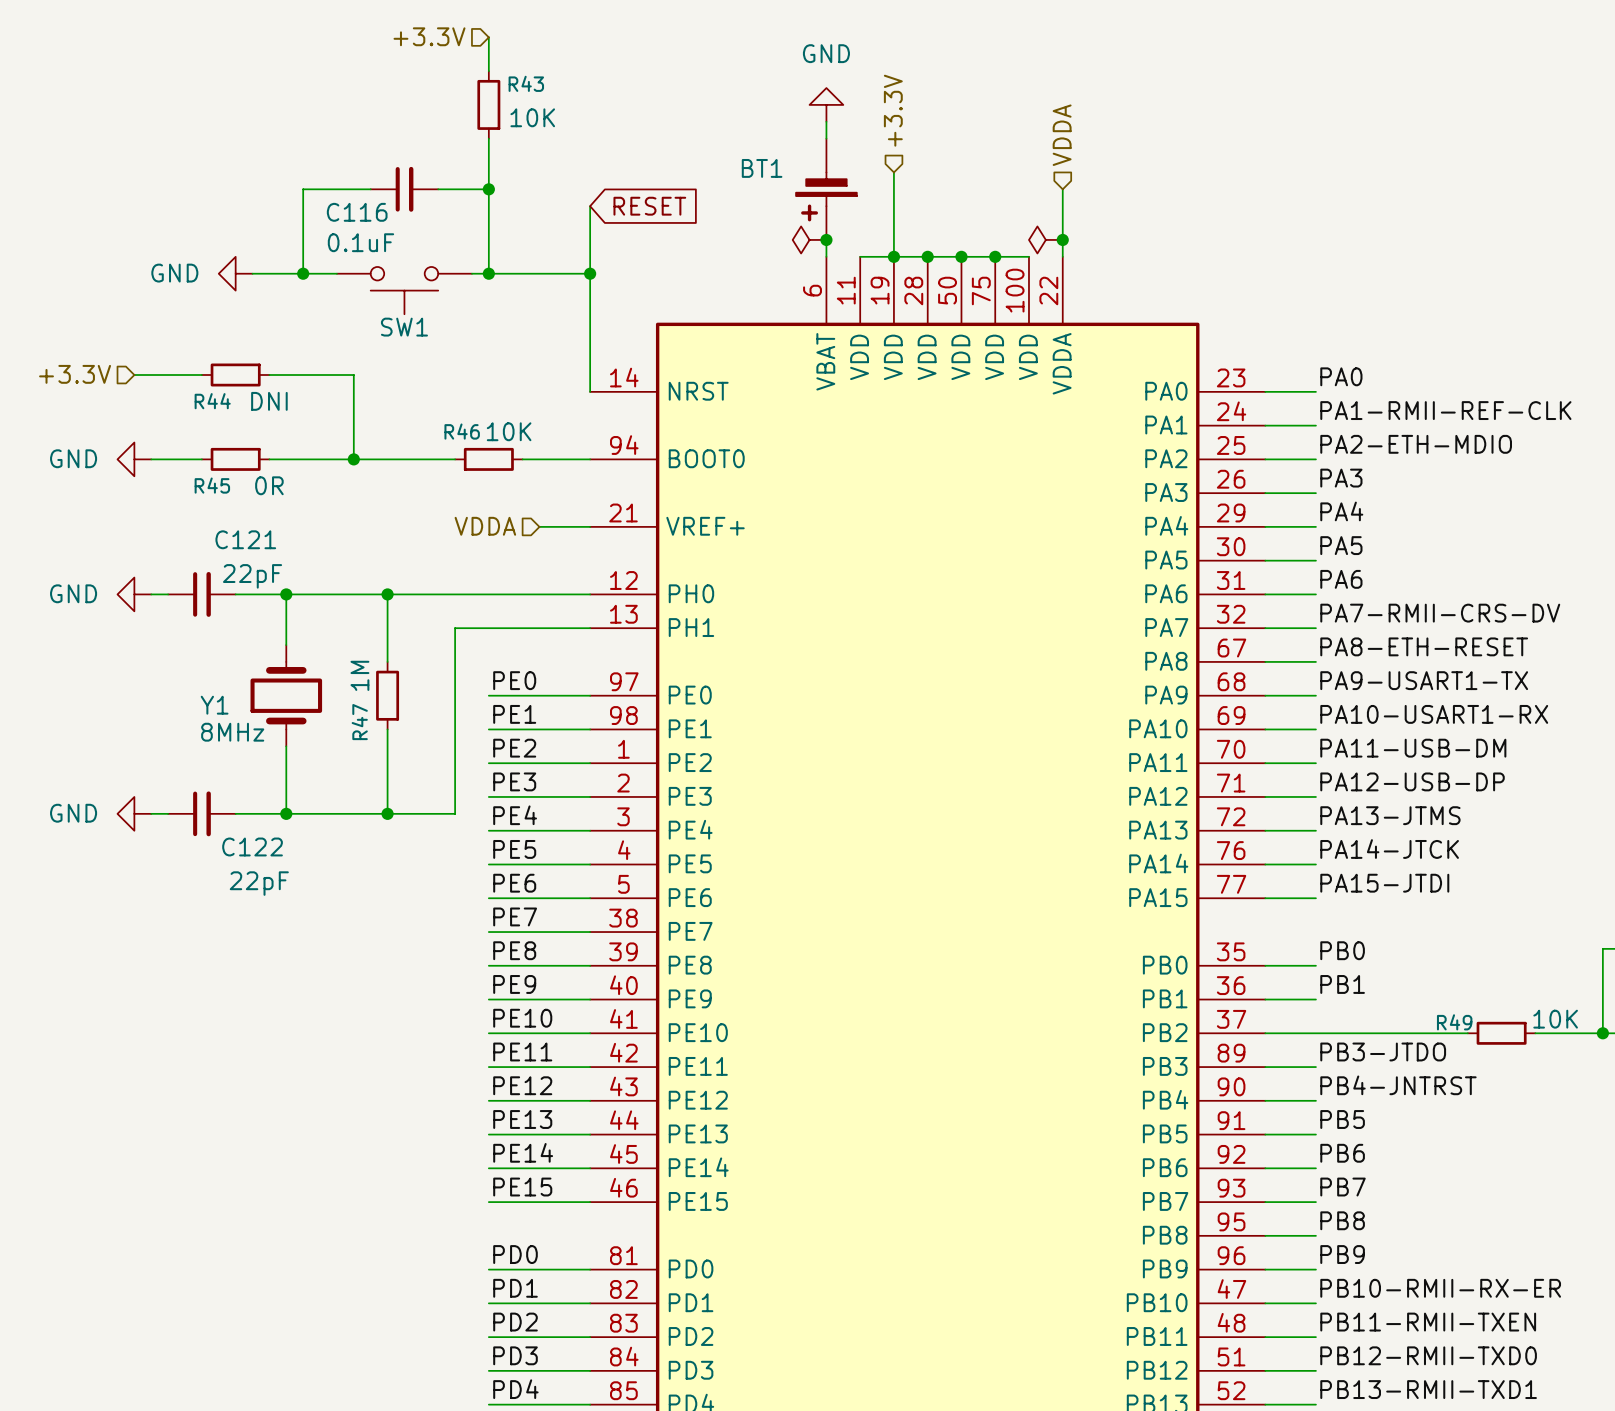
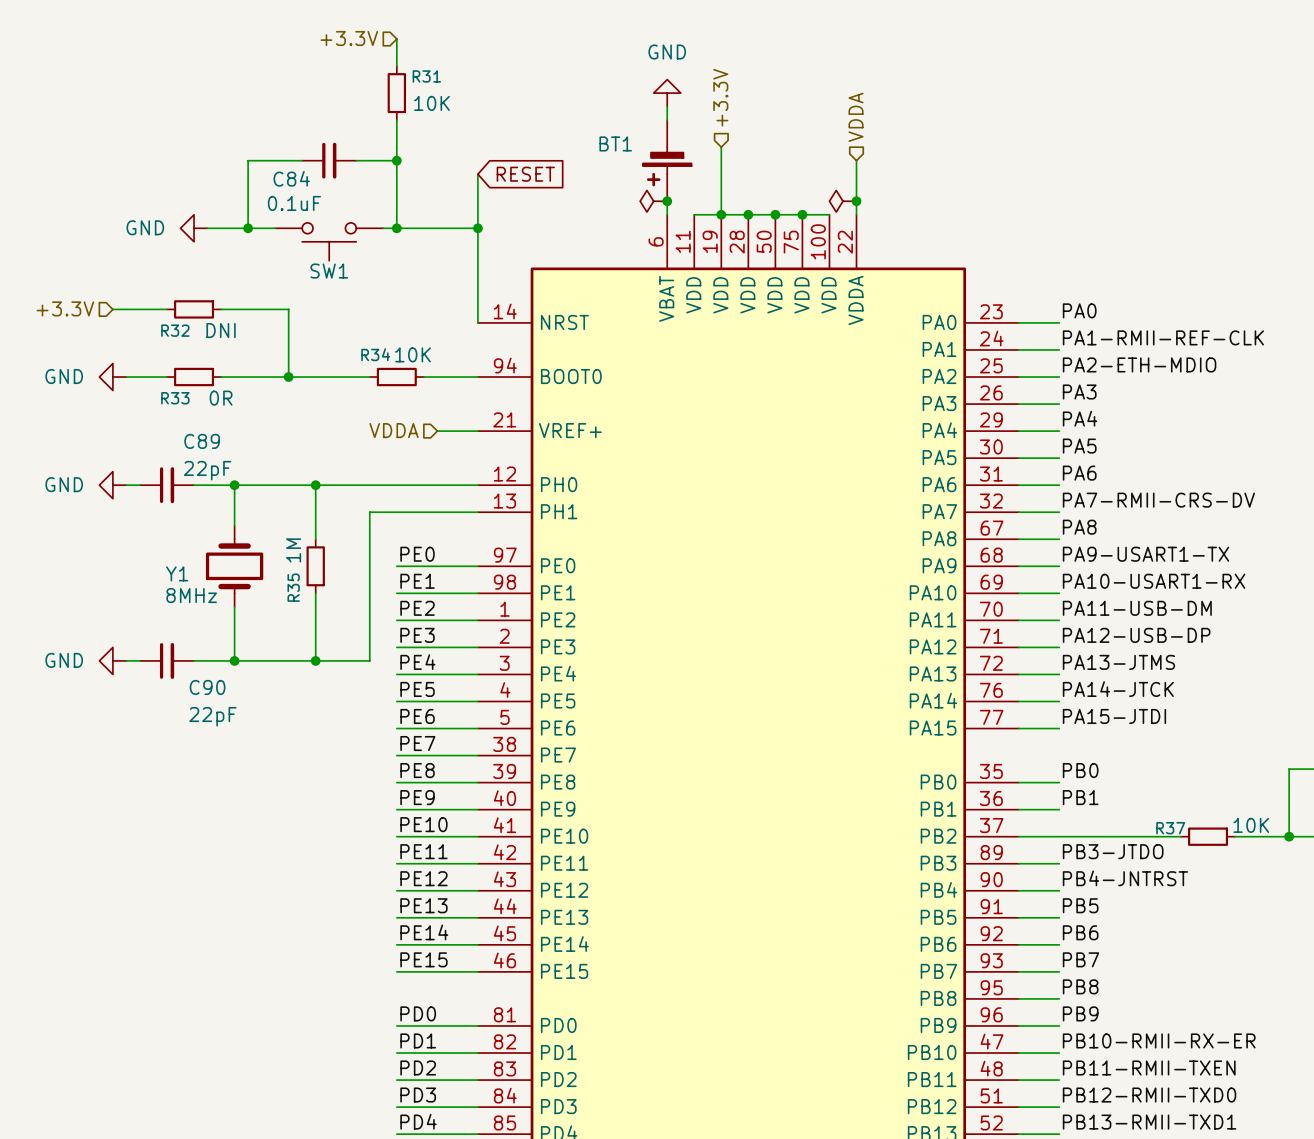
R43 name: R43 (526, 83) -> R31 (426, 76)
C116 name: C116 (357, 212) -> C84 (291, 178)
R44 name: R44 (212, 401) -> R32 (175, 330)
R46 name: R46 (462, 431) -> R34 (375, 354)
R45 name: R45 (212, 485) -> R33 (175, 398)
C121 name: C121 (245, 539) -> C89 (202, 441)
label: PA8-ETH-RESET (1424, 646) -> PA8 (1079, 527)
R47 name: R47 (359, 722) -> R35 (293, 587)
C122 name: C122 (252, 846) -> C90 (207, 687)
R49 name: R49 (1454, 1022) -> R37 (1170, 828)

